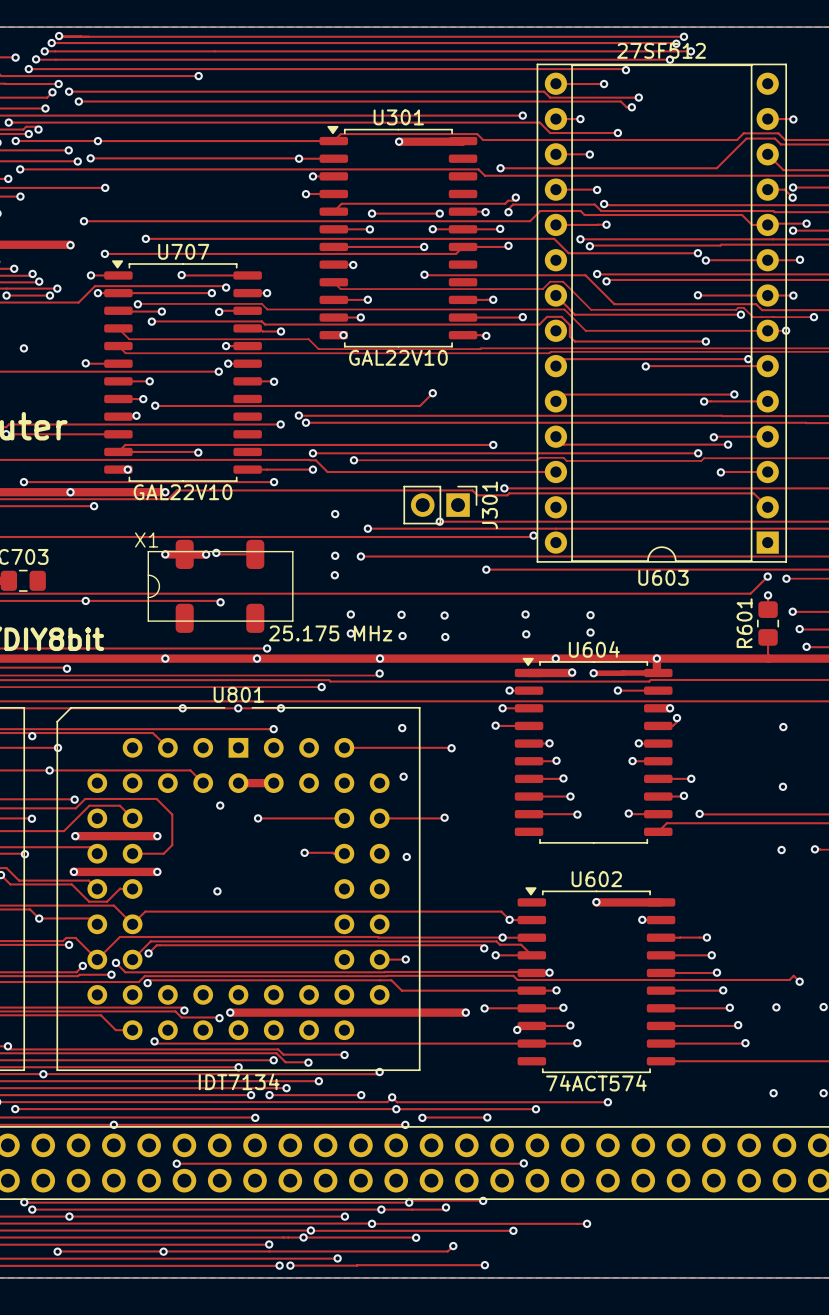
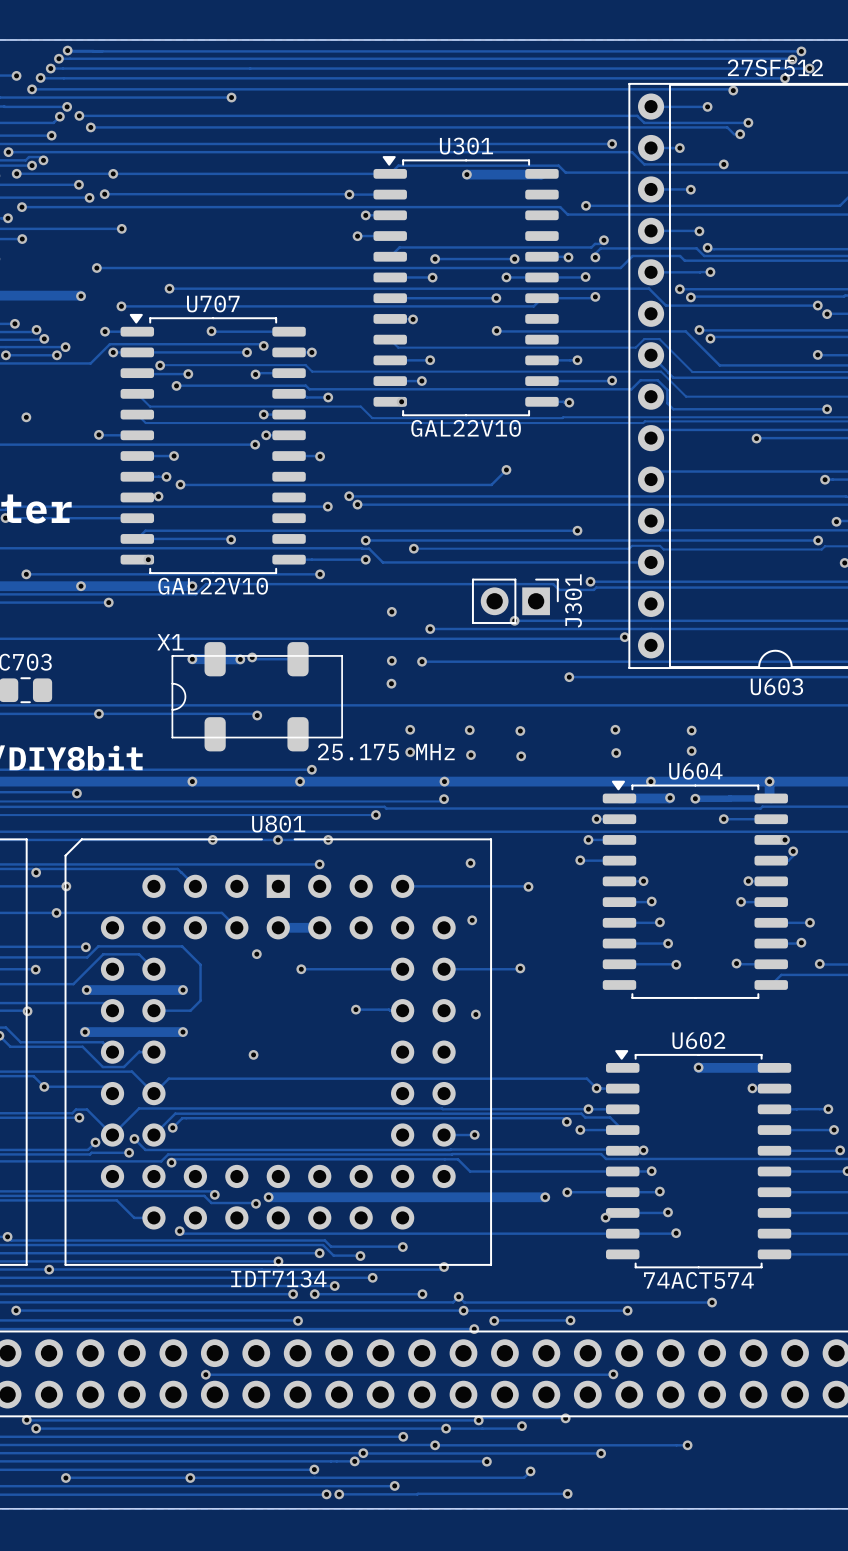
via: (113, 1124) -> none
via: (69, 1216) -> none

